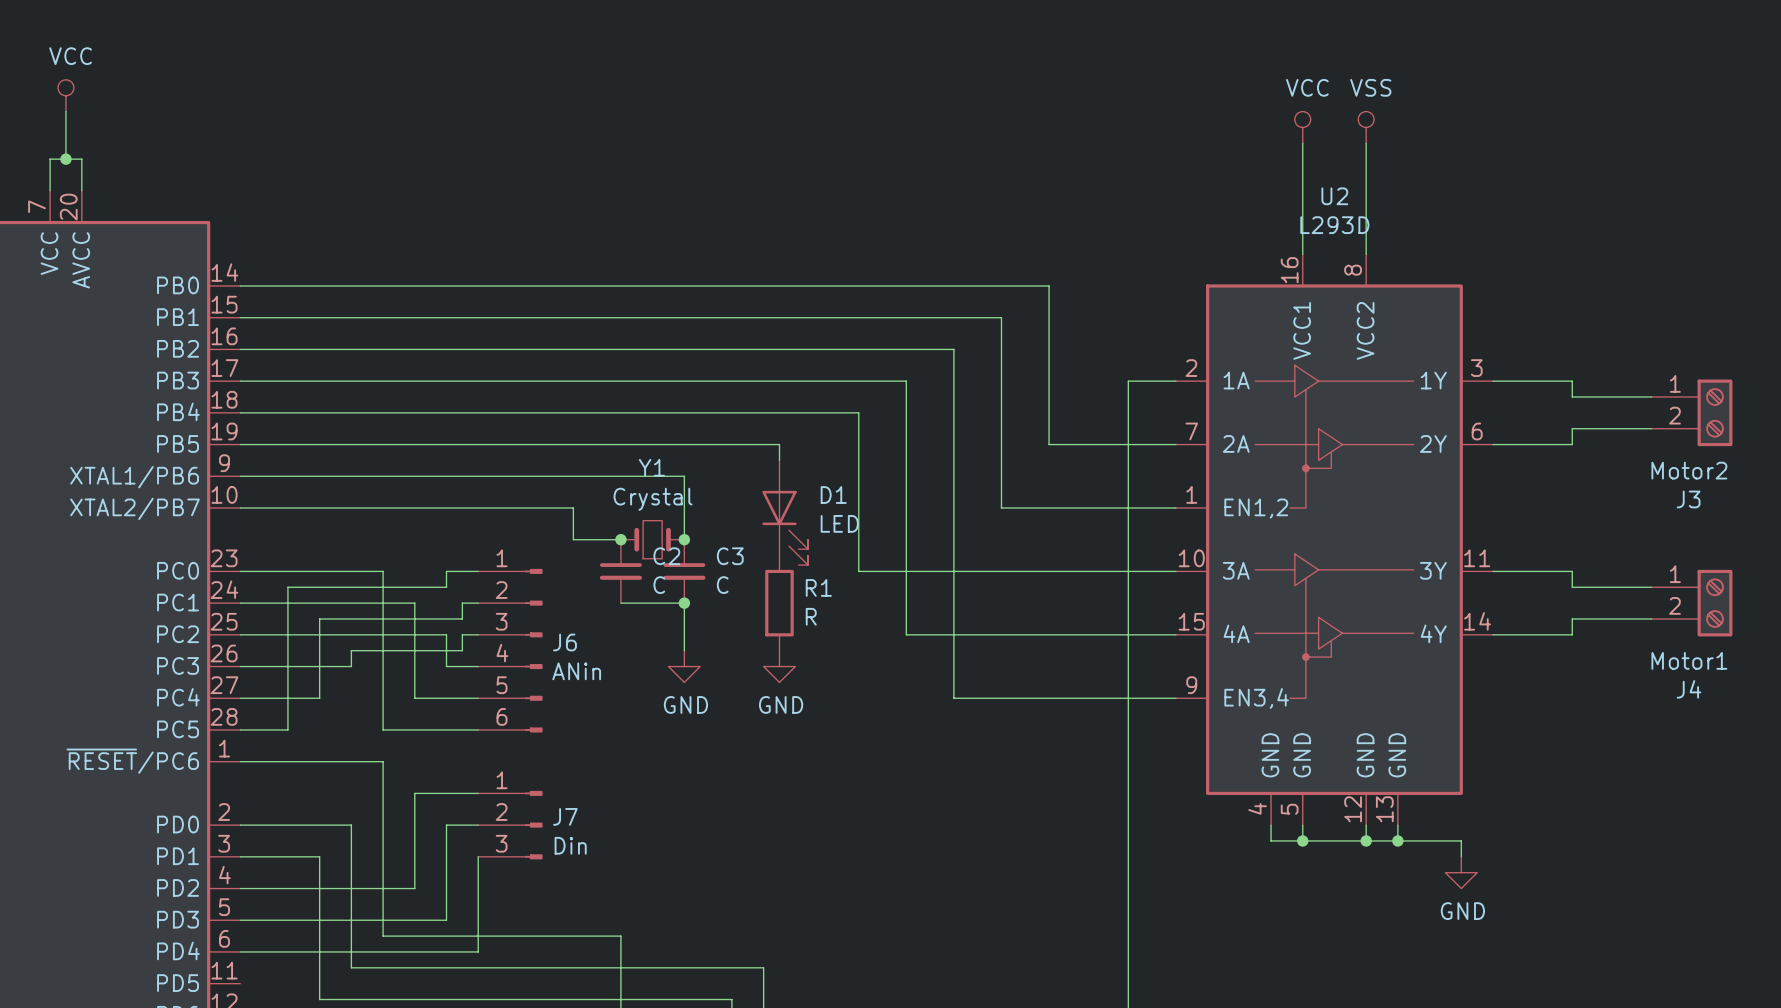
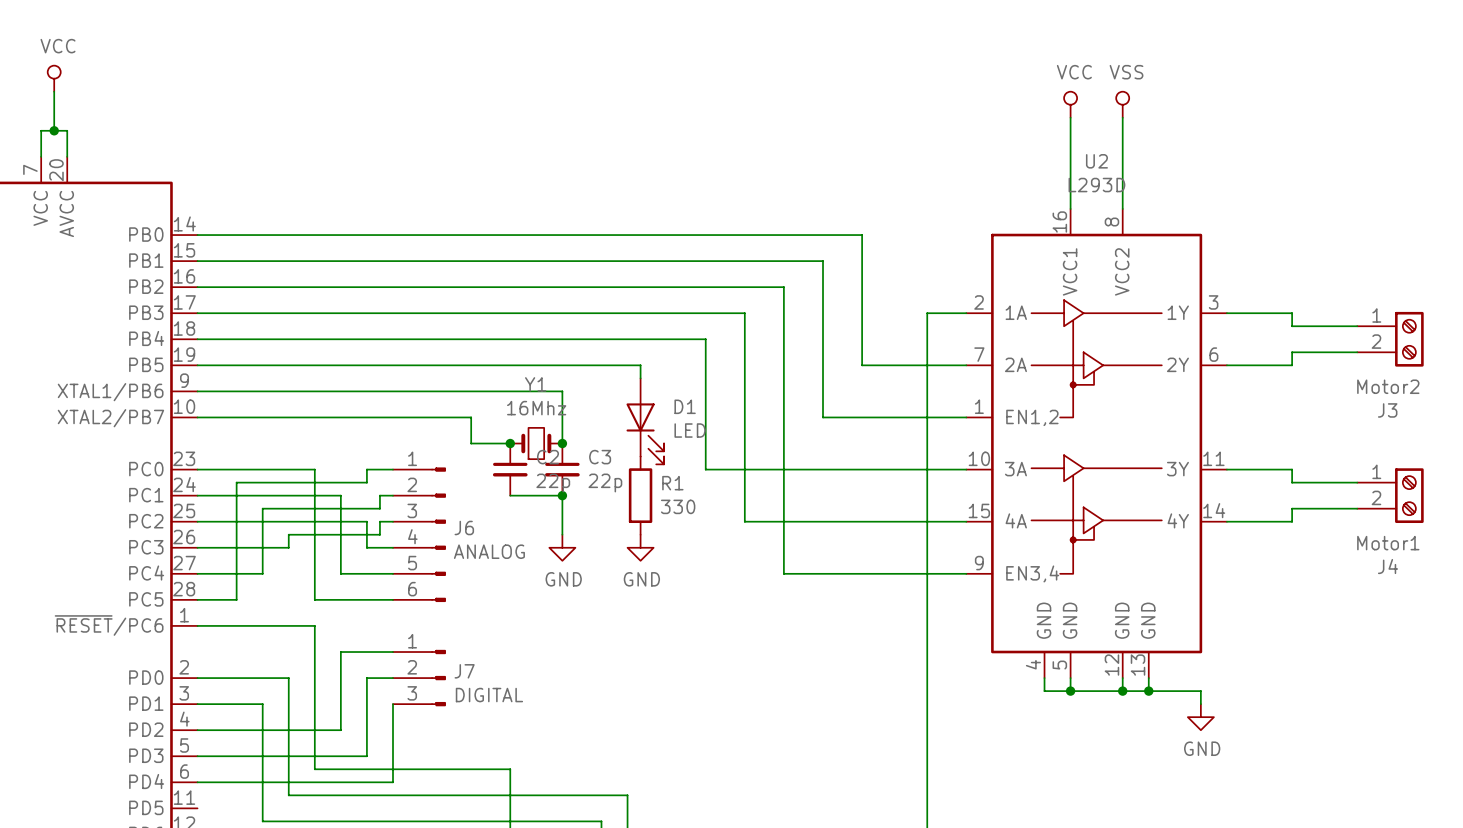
Y1 value: Crystal (653, 499) -> 16Mhz (536, 408)
C2 value: C (659, 585) -> 22p (553, 482)
C3 value: C (722, 585) -> 22p (605, 482)
R1 value: R (811, 616) -> 330 (678, 506)
J6 value: ANin (576, 671) -> ANALOG (489, 551)
J7 value: Din (570, 845) -> DIGITAL (489, 695)

